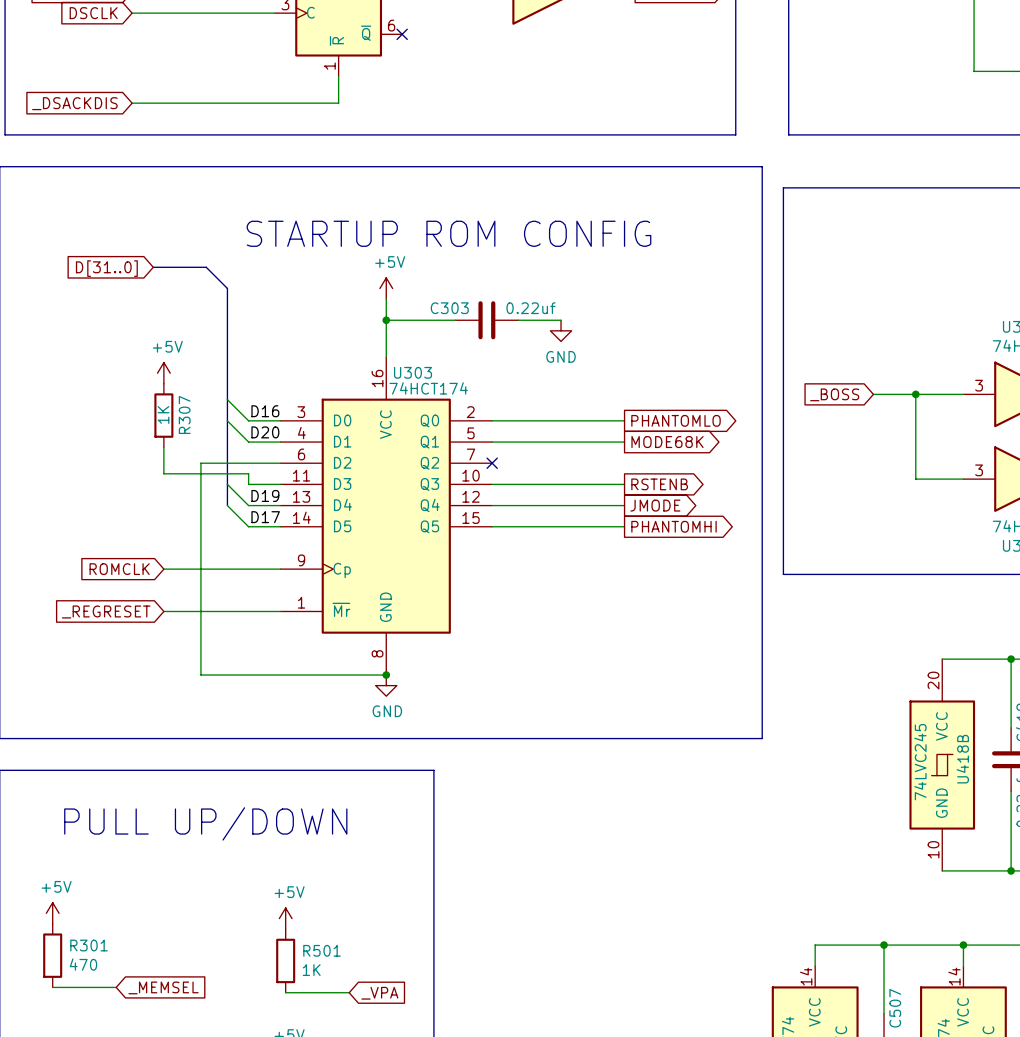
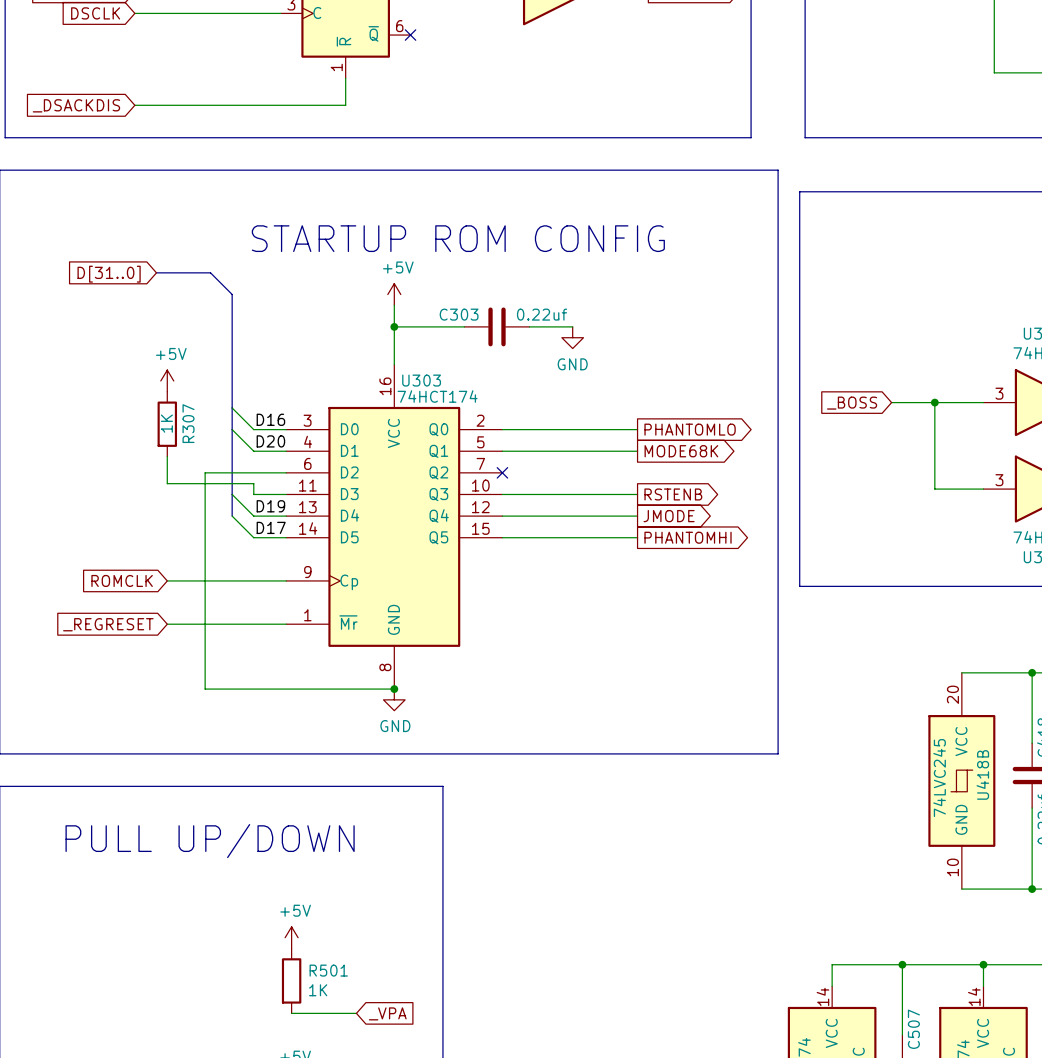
power symbol: +5V (52, 913) -> none
R301: 470 (52, 955) -> none
wire: (52, 987) (116, 987) -> none
global label: _MEMSEL (163, 987) -> none

